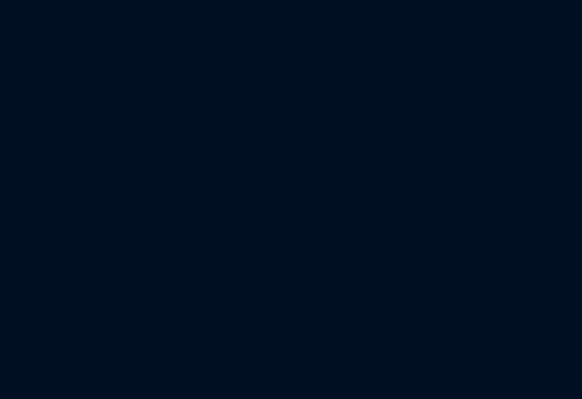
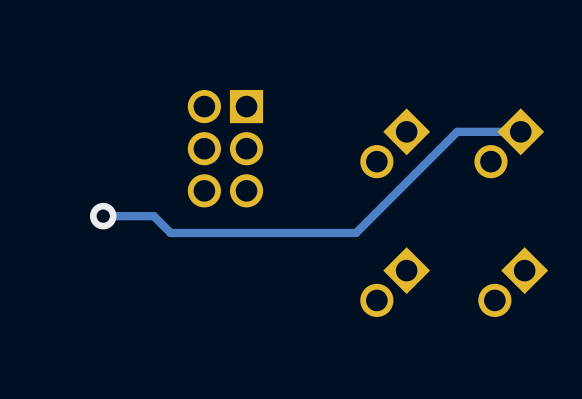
track: none -> (520, 131) (457, 131) (356, 232) (170, 232) (153, 216) (103, 216)
part: none -> (395, 143)
part: none -> (509, 143)
part: none -> (225, 148)
via: none -> (103, 216)
part: none -> (395, 282)
part: none -> (513, 282)

